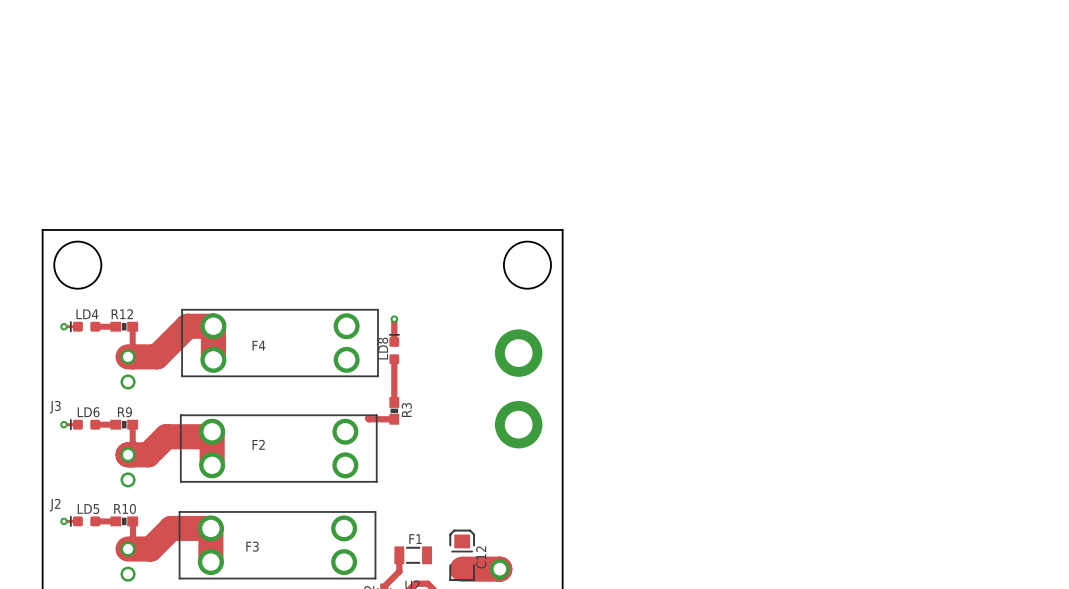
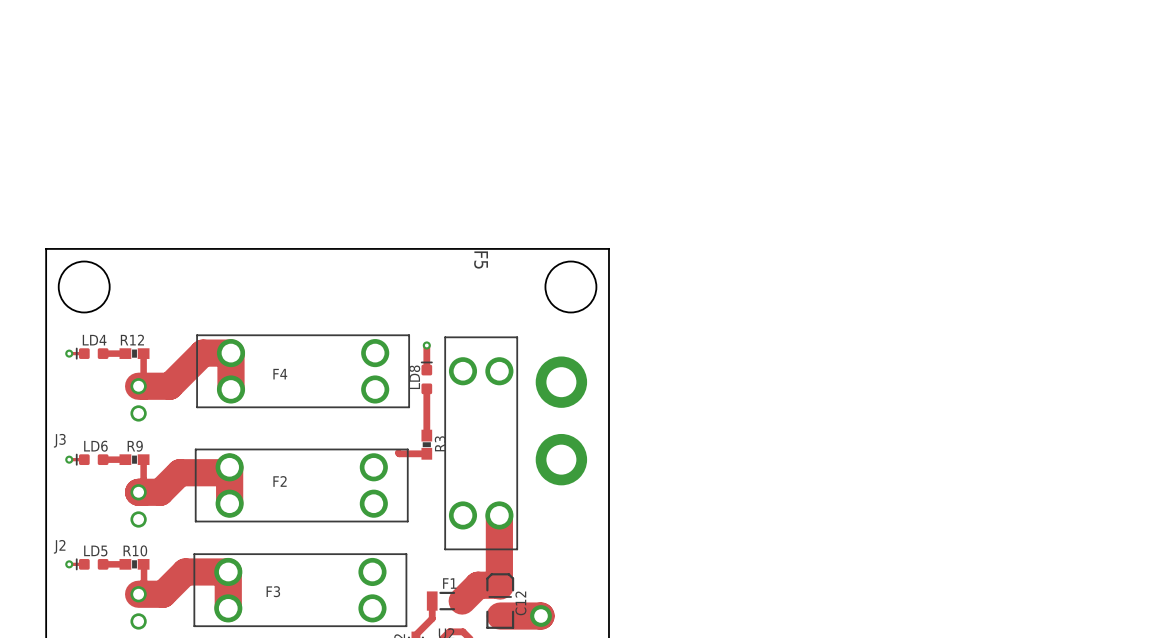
F5: none -> (481, 443)
top track: none -> (499, 515) (499, 585)
top track: none -> (499, 585) (478, 585) (462, 601)

